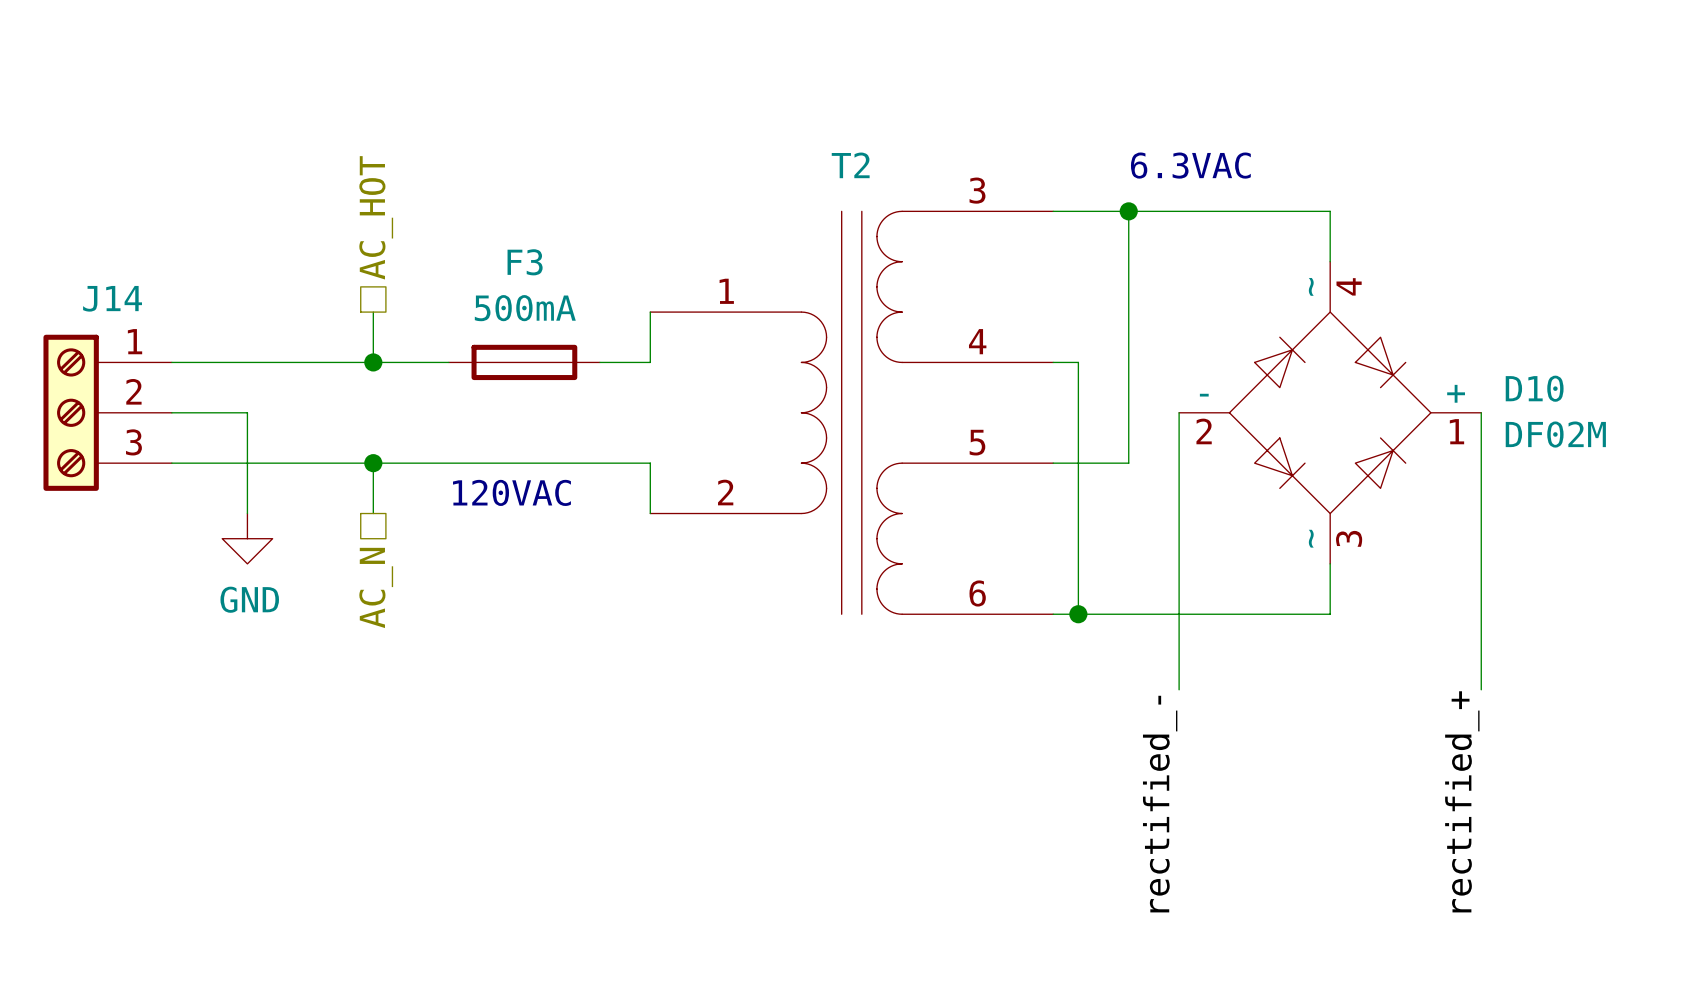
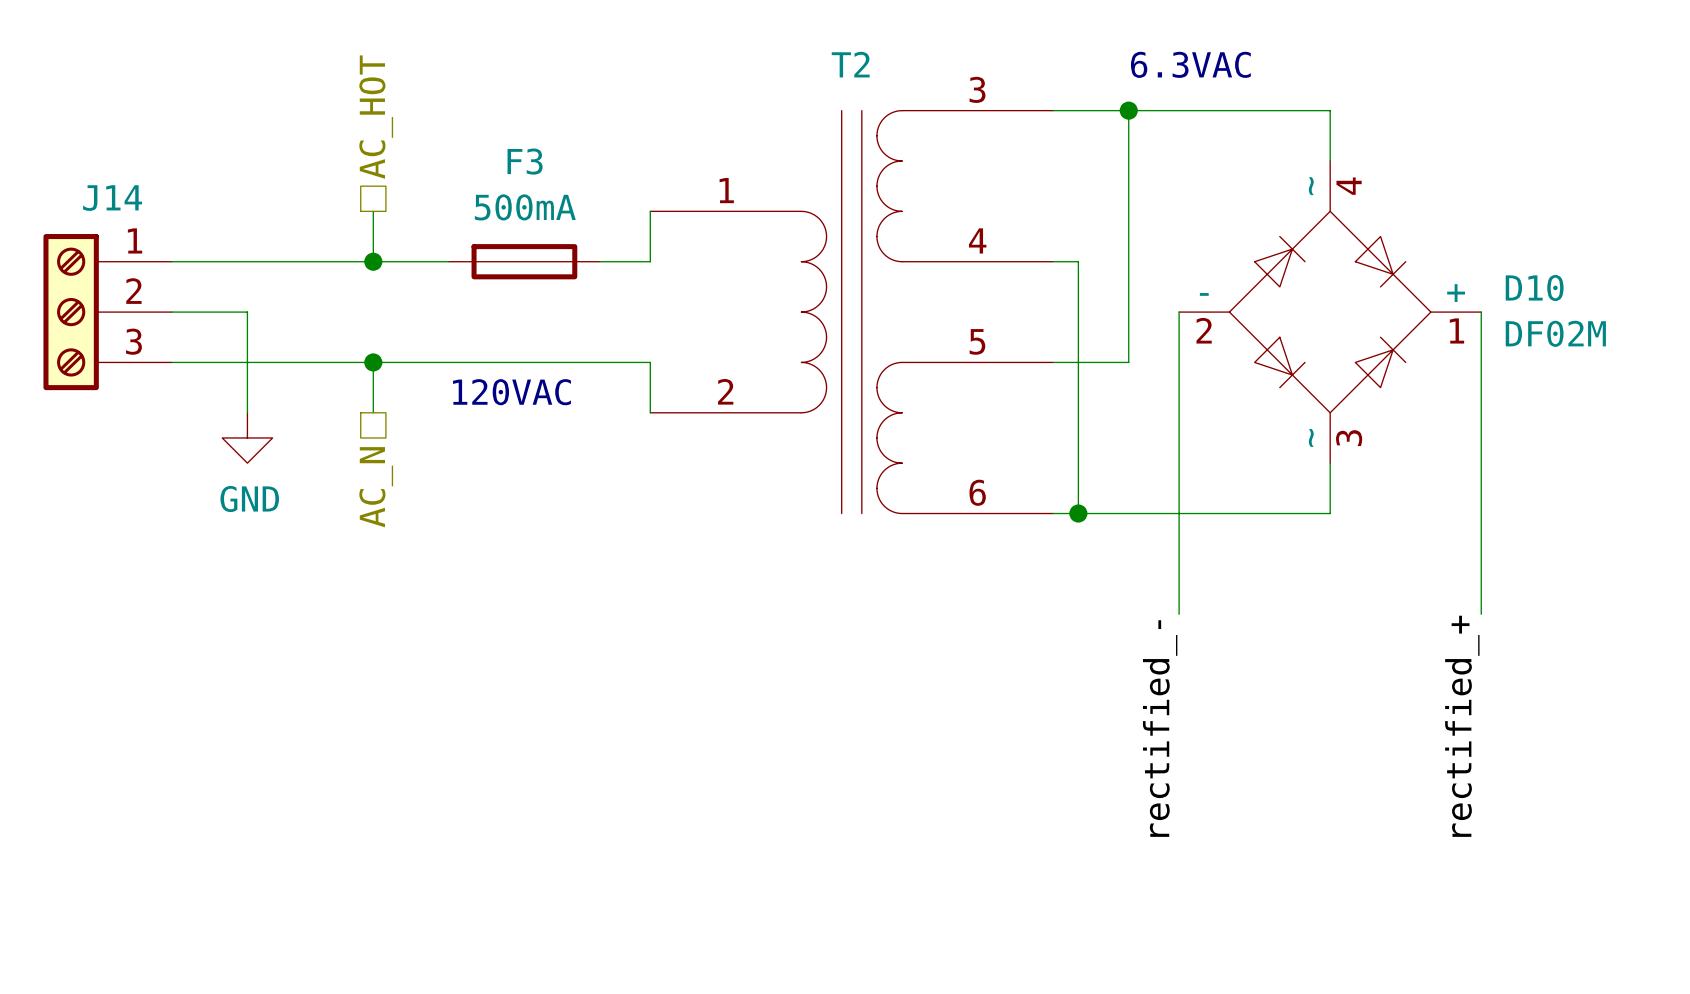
wire: none -> (1128, 110) (1128, 211)
text position: 6.3VAC (1190, 165) -> 6.3VAC (1190, 64)
wire: none -> (650, 211) (650, 261) (599, 261)
wire: (1053, 211) (1330, 211) (1330, 261) -> (1053, 110) (1330, 110) (1330, 160)
junction position: (1128, 211) -> (1128, 110)
hierarchical label position: AC_HOT (376, 217) -> AC_HOT (376, 117)
wire: none -> (171, 261) (448, 261)
junction: none -> (373, 261)
wire: (373, 312) (373, 362) -> (373, 412) (373, 362)
wire: (650, 312) (650, 362) -> (650, 412) (650, 362)
wire: none -> (1481, 312) (1481, 412)
F3 position: (524, 362) -> (524, 261)
wire: (1128, 362) (1128, 463) (1053, 463) -> (1128, 362) (1078, 362) (1078, 261) (1053, 261)
J14 position: (107, 412) -> (107, 312)
wire: (171, 412) (247, 412) (247, 513) -> (171, 312) (247, 312) (247, 412)
T2 position: (851, 412) -> (851, 312)
D10 position: (1330, 412) -> (1330, 312)
wire: (171, 463) (650, 463) (650, 513) -> none
wire: (373, 463) (373, 513) -> (373, 211) (373, 261)
junction: (373, 463) -> none
text position: 120VAC (511, 492) -> 120VAC (511, 392)
wire: (1078, 513) (1078, 614) -> (1179, 312) (1179, 412)
power symbol position: GND (247, 538) -> GND (247, 437)
wire: (1330, 563) (1330, 614) (1053, 614) -> (1330, 463) (1330, 513) (1053, 513)
hierarchical label position: AC_N (376, 587) -> AC_N (376, 487)
junction position: (1078, 614) -> (1078, 513)
wire: (1179, 614) (1179, 689) -> none
wire: (1481, 614) (1481, 689) -> none
label position: rectified_+ (1462, 801) -> rectified_+ (1462, 726)
label position: rectified_- (1160, 804) -> rectified_- (1160, 728)

